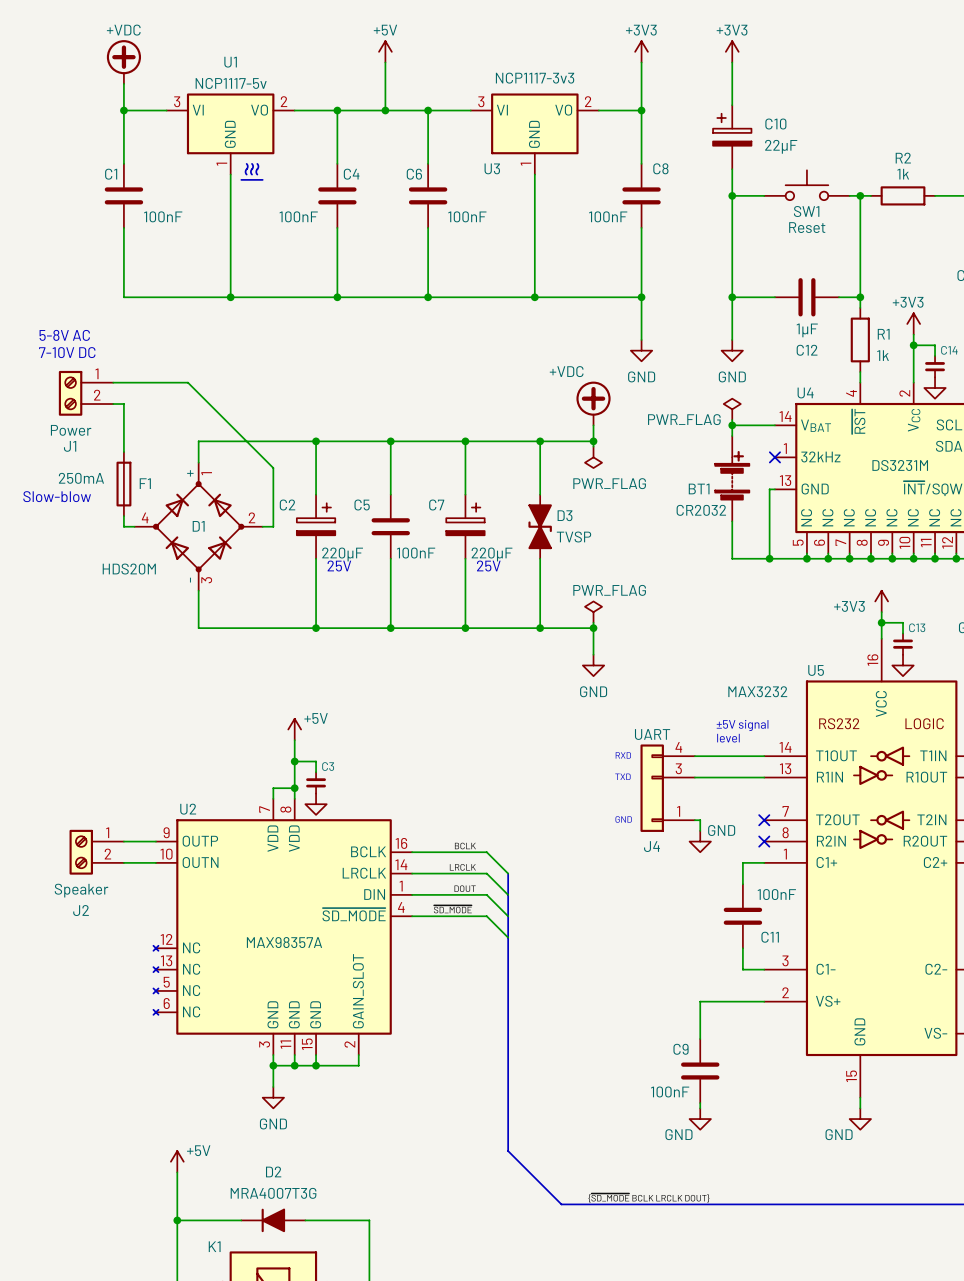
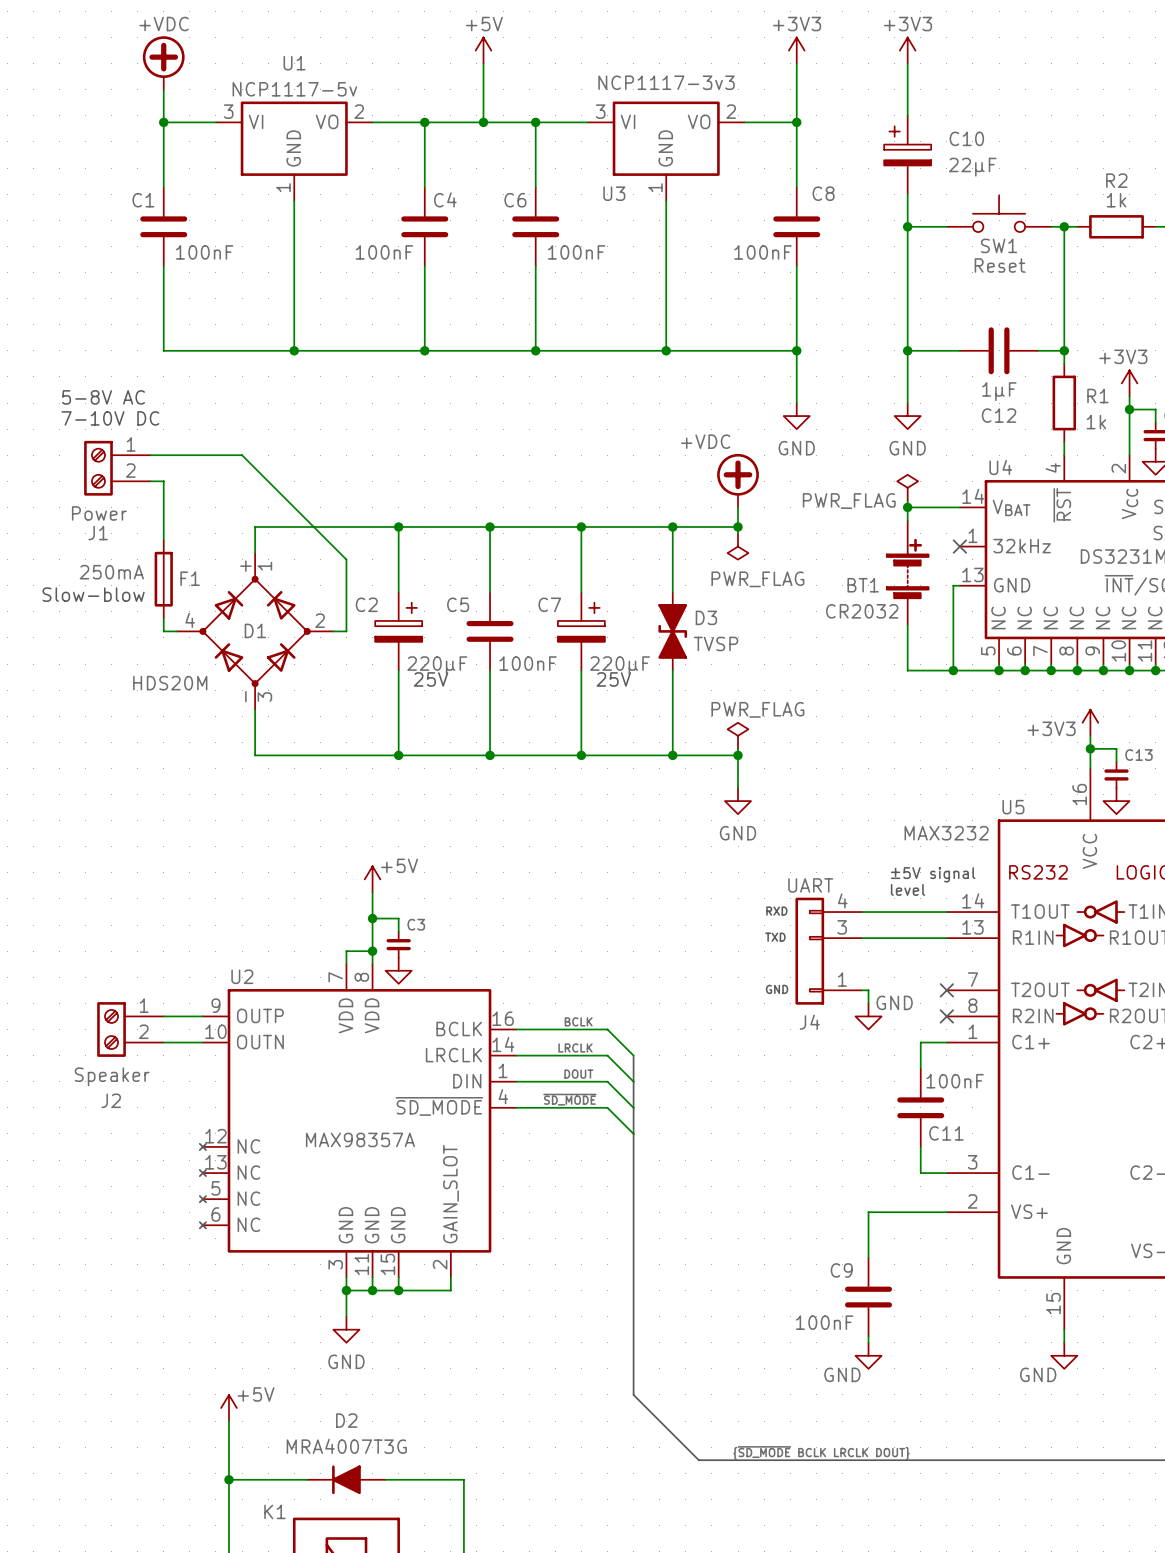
line: (246, 163) (246, 174) -> none
line: (252, 163) (252, 174) -> none
line: (257, 163) (257, 174) -> none
line: (241, 179) (262, 179) -> none

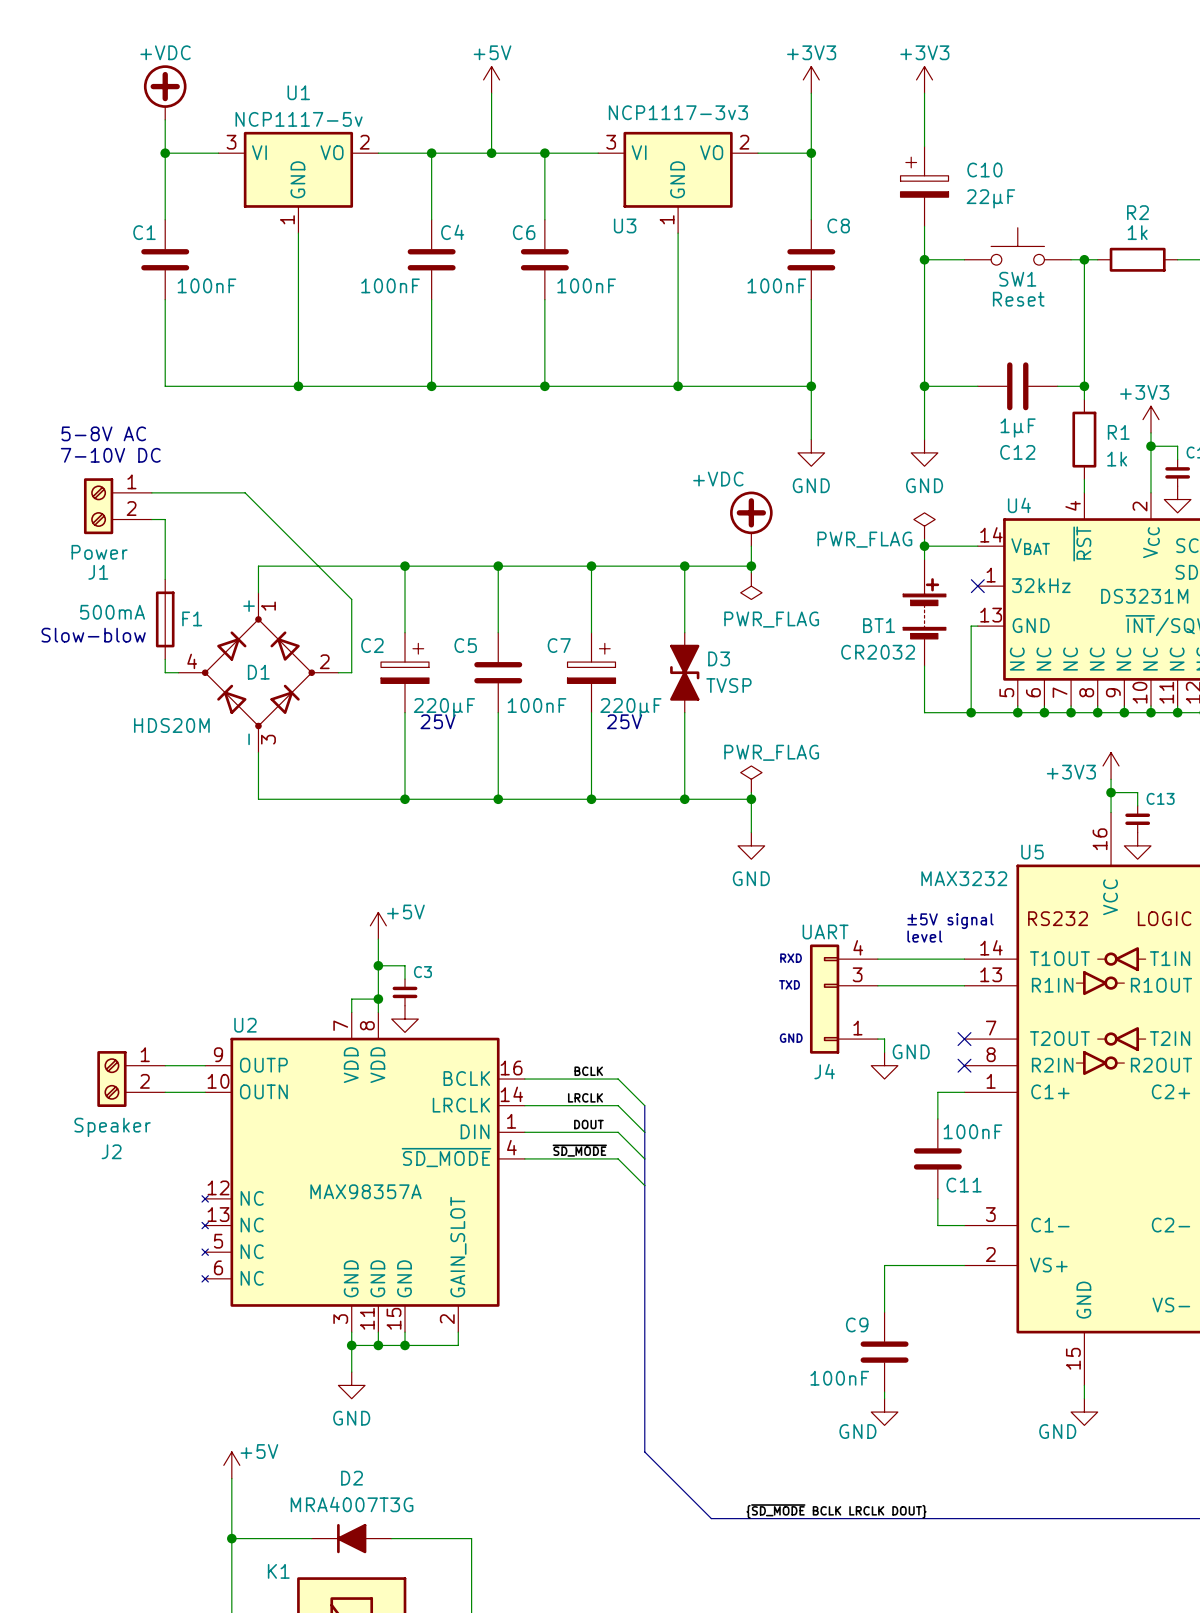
F1 value: 250mA (111, 572) -> 500mA (112, 612)

